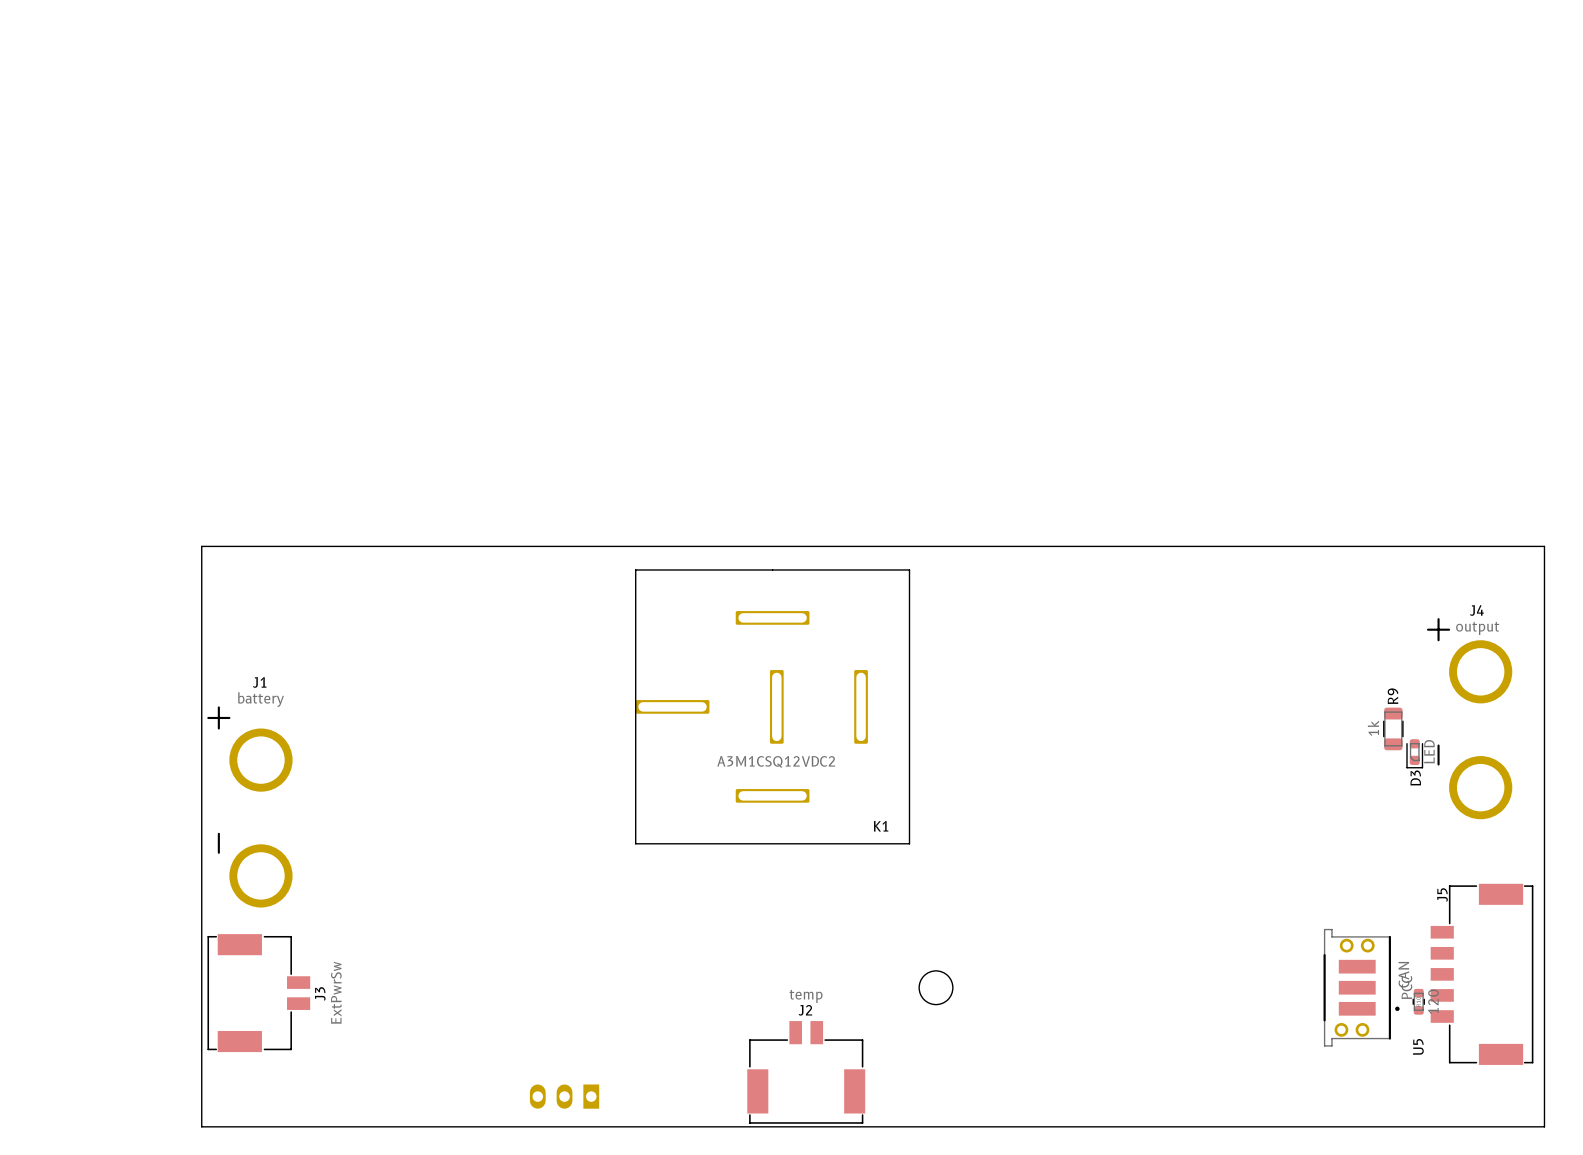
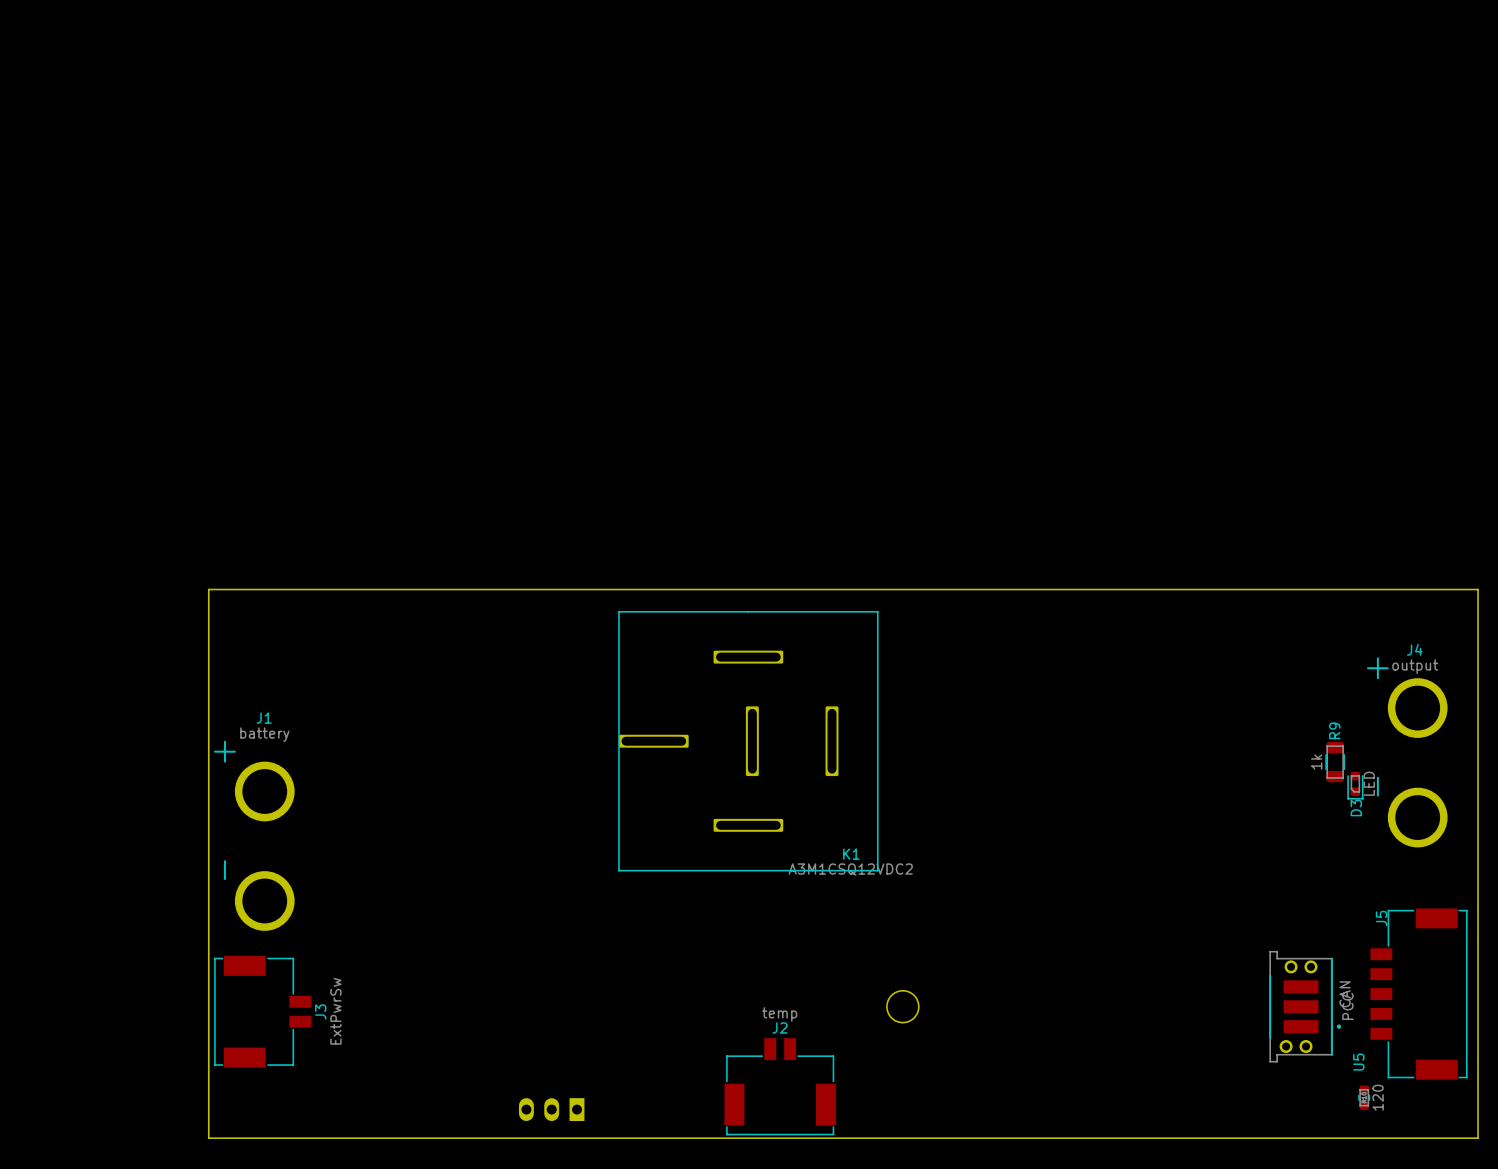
K1 value position: A3M1CSQ12VDC2 (776, 761) -> A3M1CSQ12VDC2 (850, 869)
part position: (1418, 1001) -> (1364, 1097)

